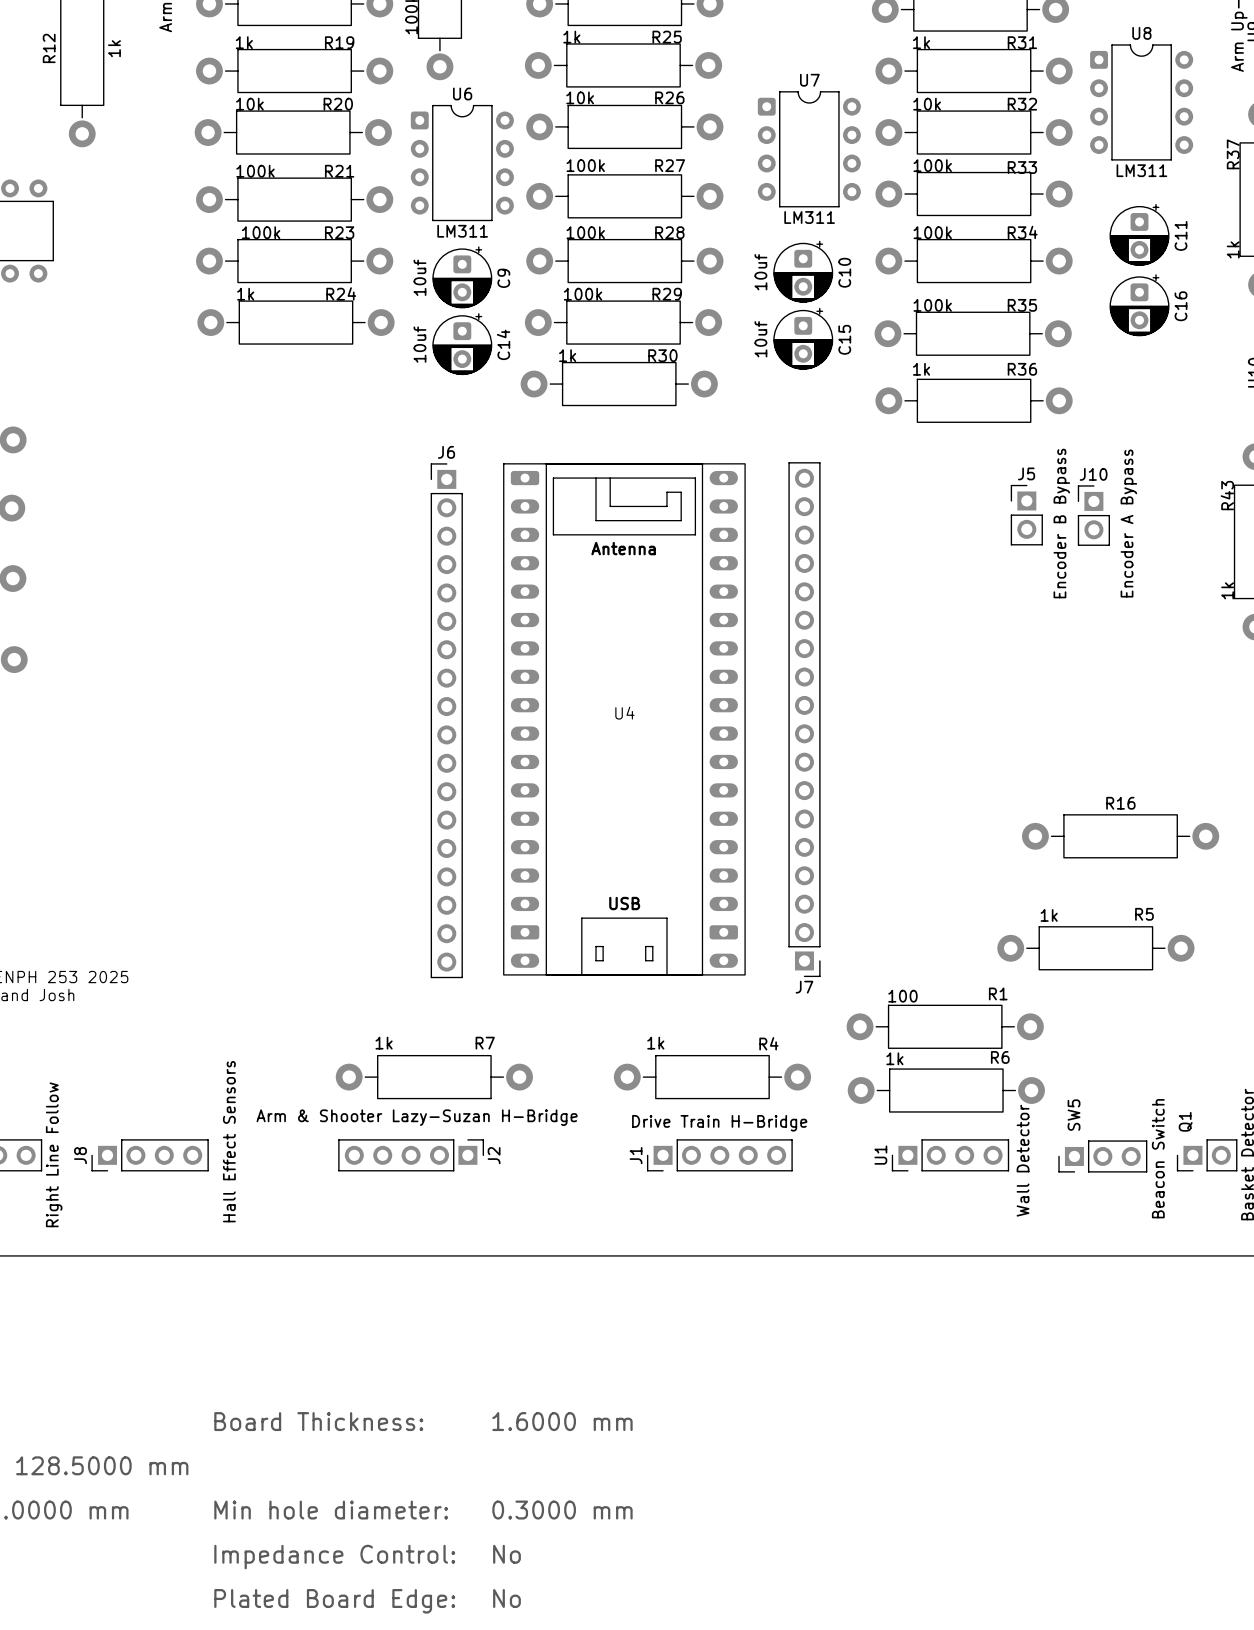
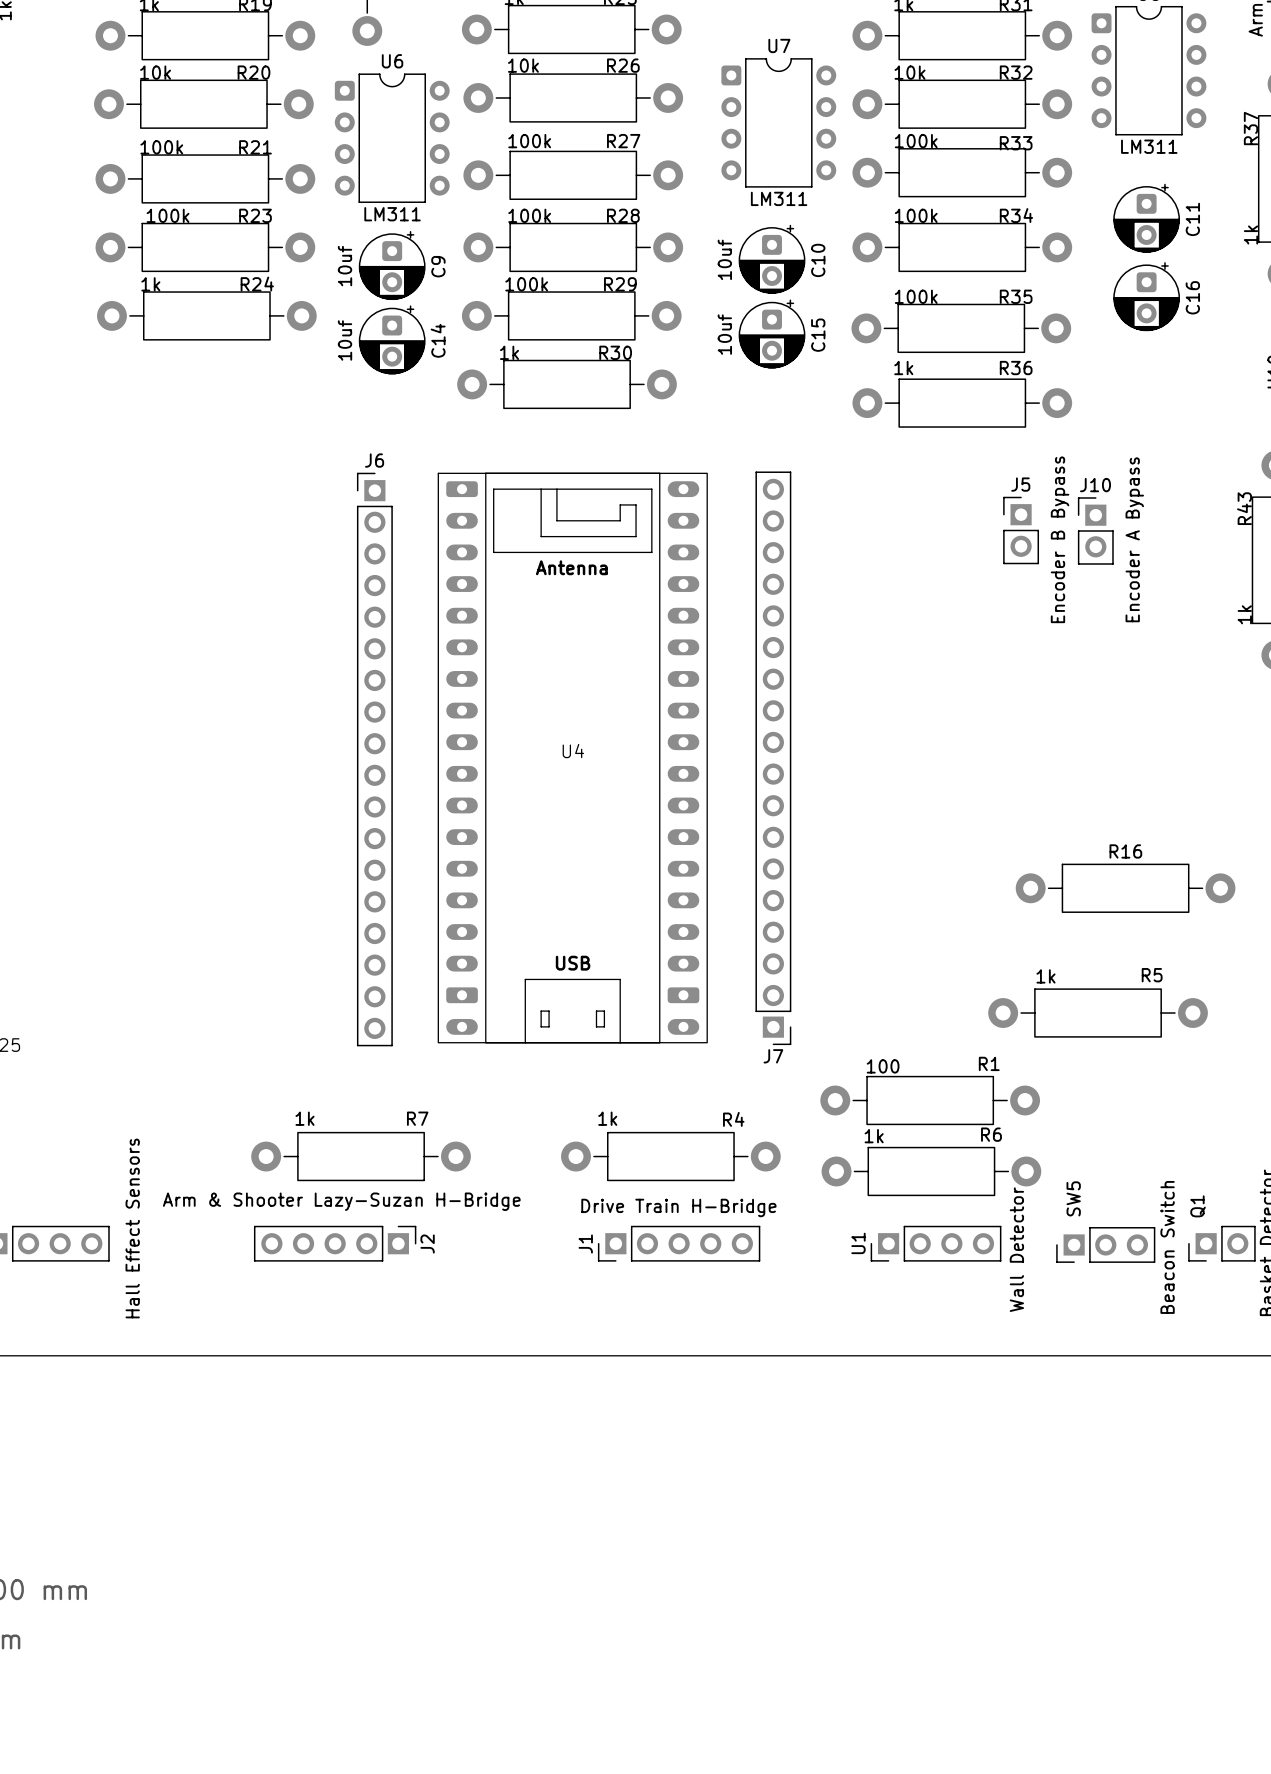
text: Board Thickness: (318, 1421) -> none
text: 1.6000 mm (562, 1421) -> none
text: Min hole diameter: (331, 1510) -> none
text: 0.3000 mm (562, 1510) -> none
text: No (506, 1554) -> none
text: Impedance Control: (334, 1557) -> none
text: No (506, 1598) -> none
text: Plated Board Edge: (334, 1601) -> none

